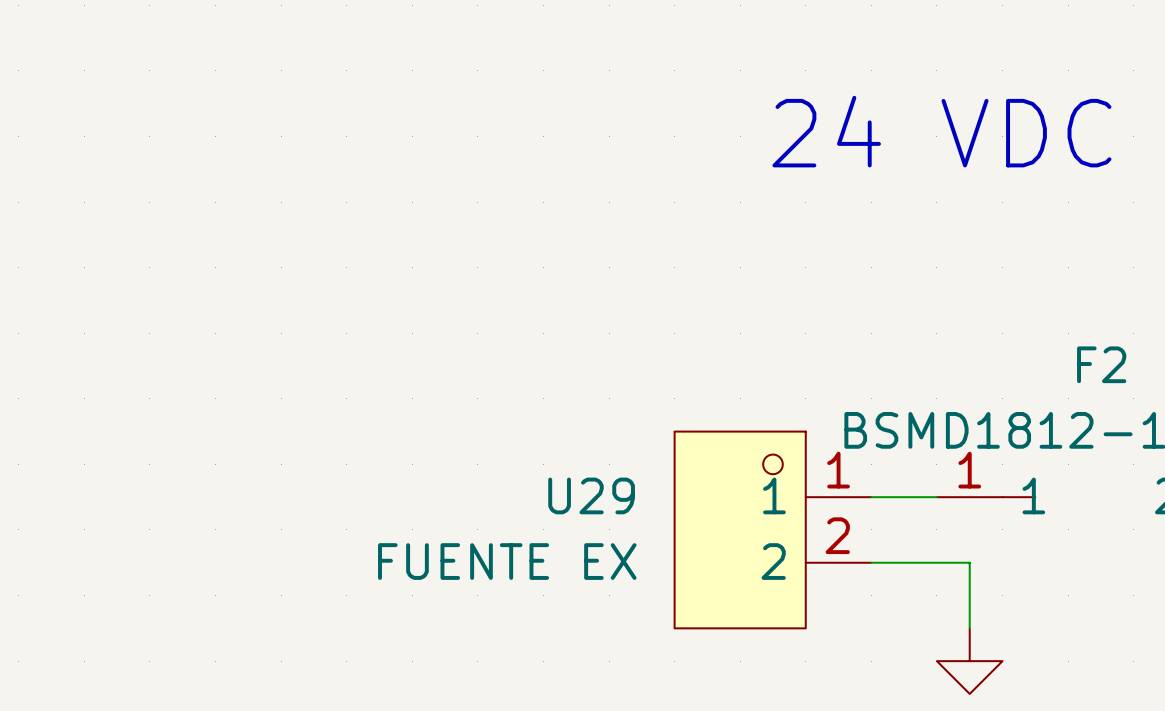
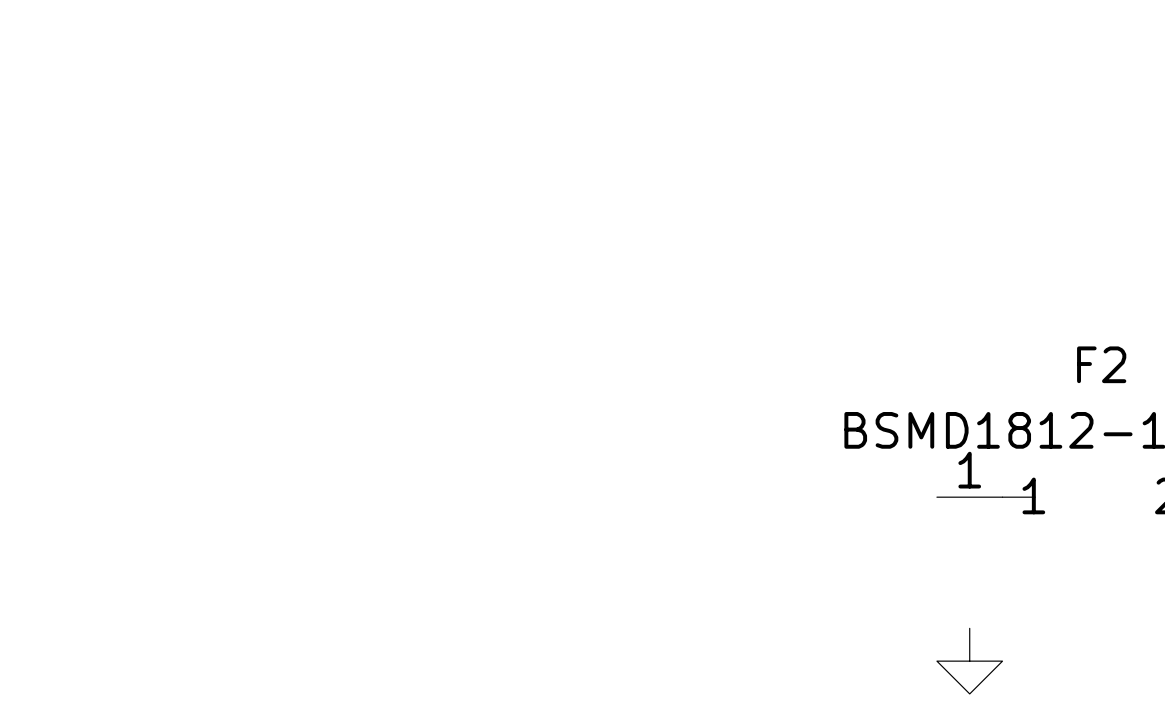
text: 24 VDC (941, 131) -> none
wire: (871, 497) (936, 497) -> none
U29: FUENTE EX (772, 529) -> none
wire: (871, 562) (969, 562) (969, 628) -> none

